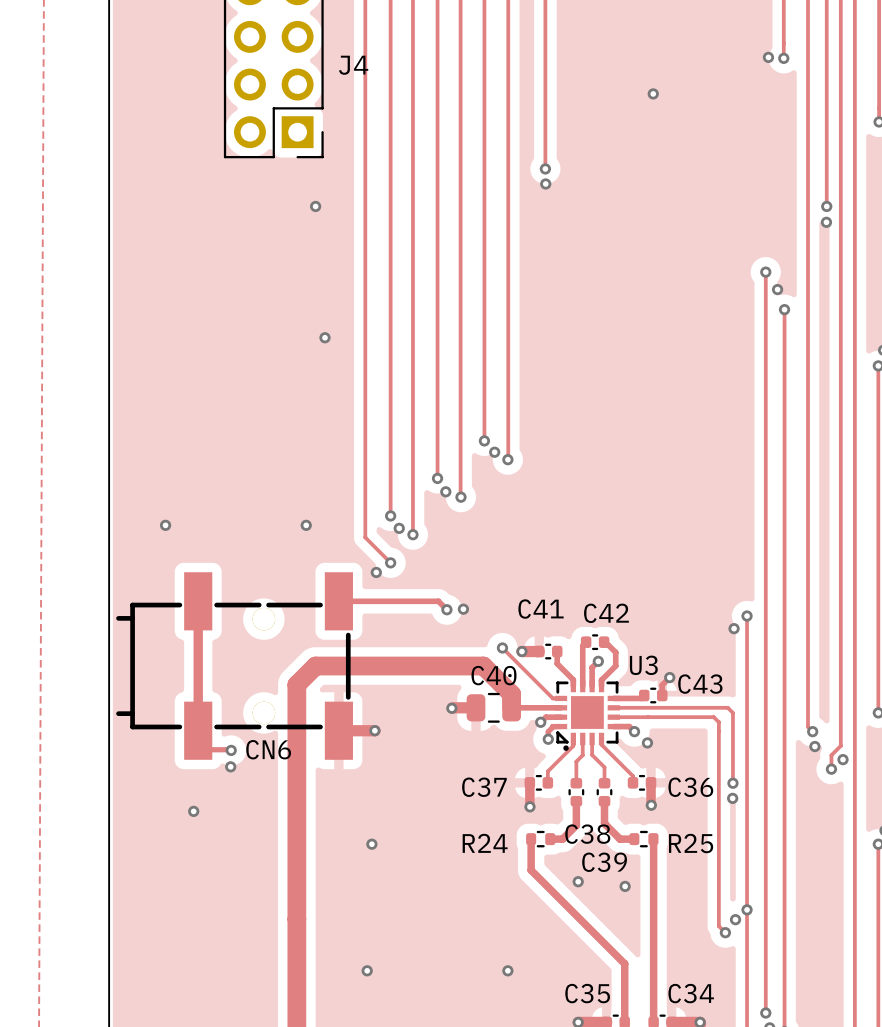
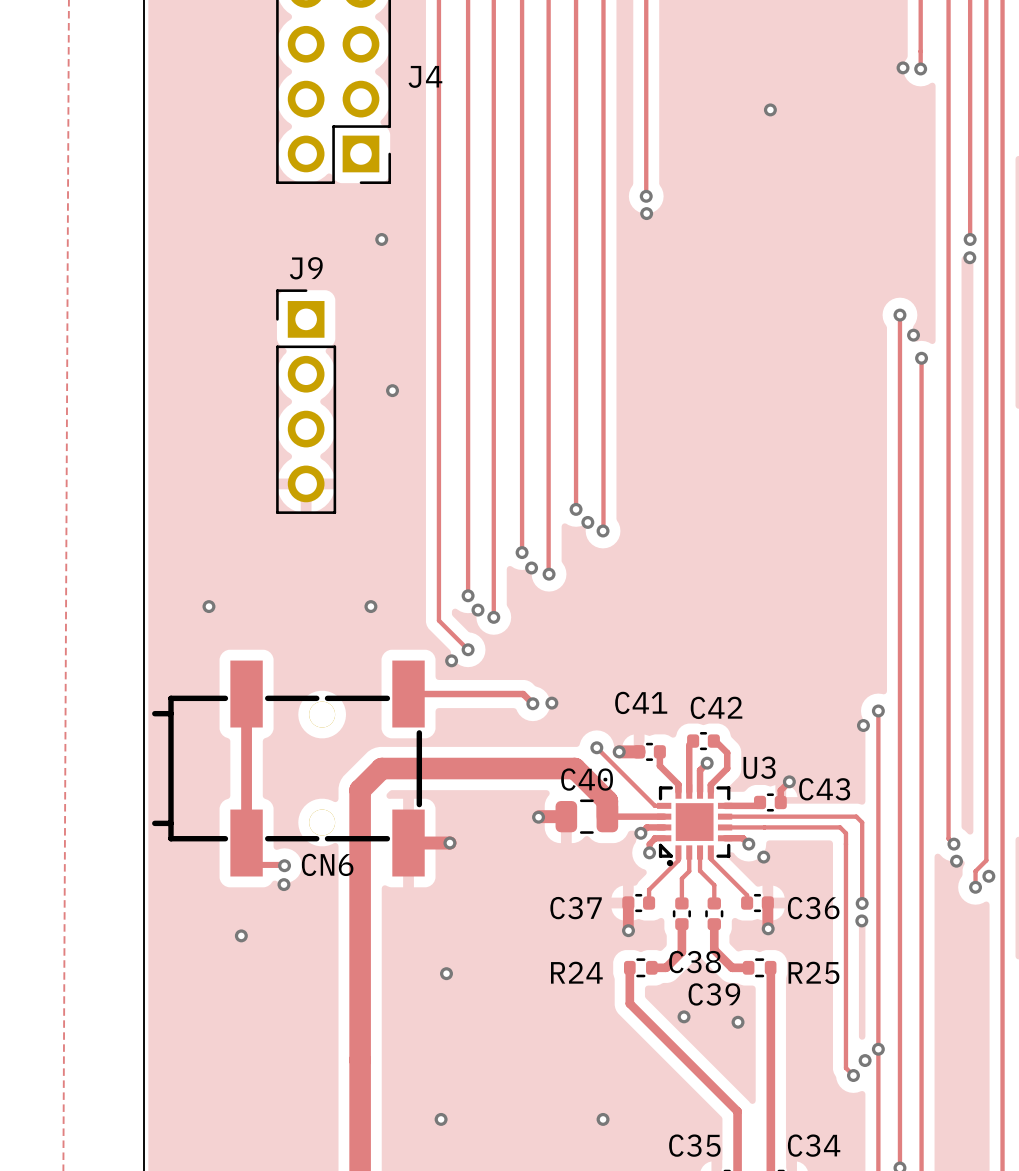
J9: none -> (306, 401)

